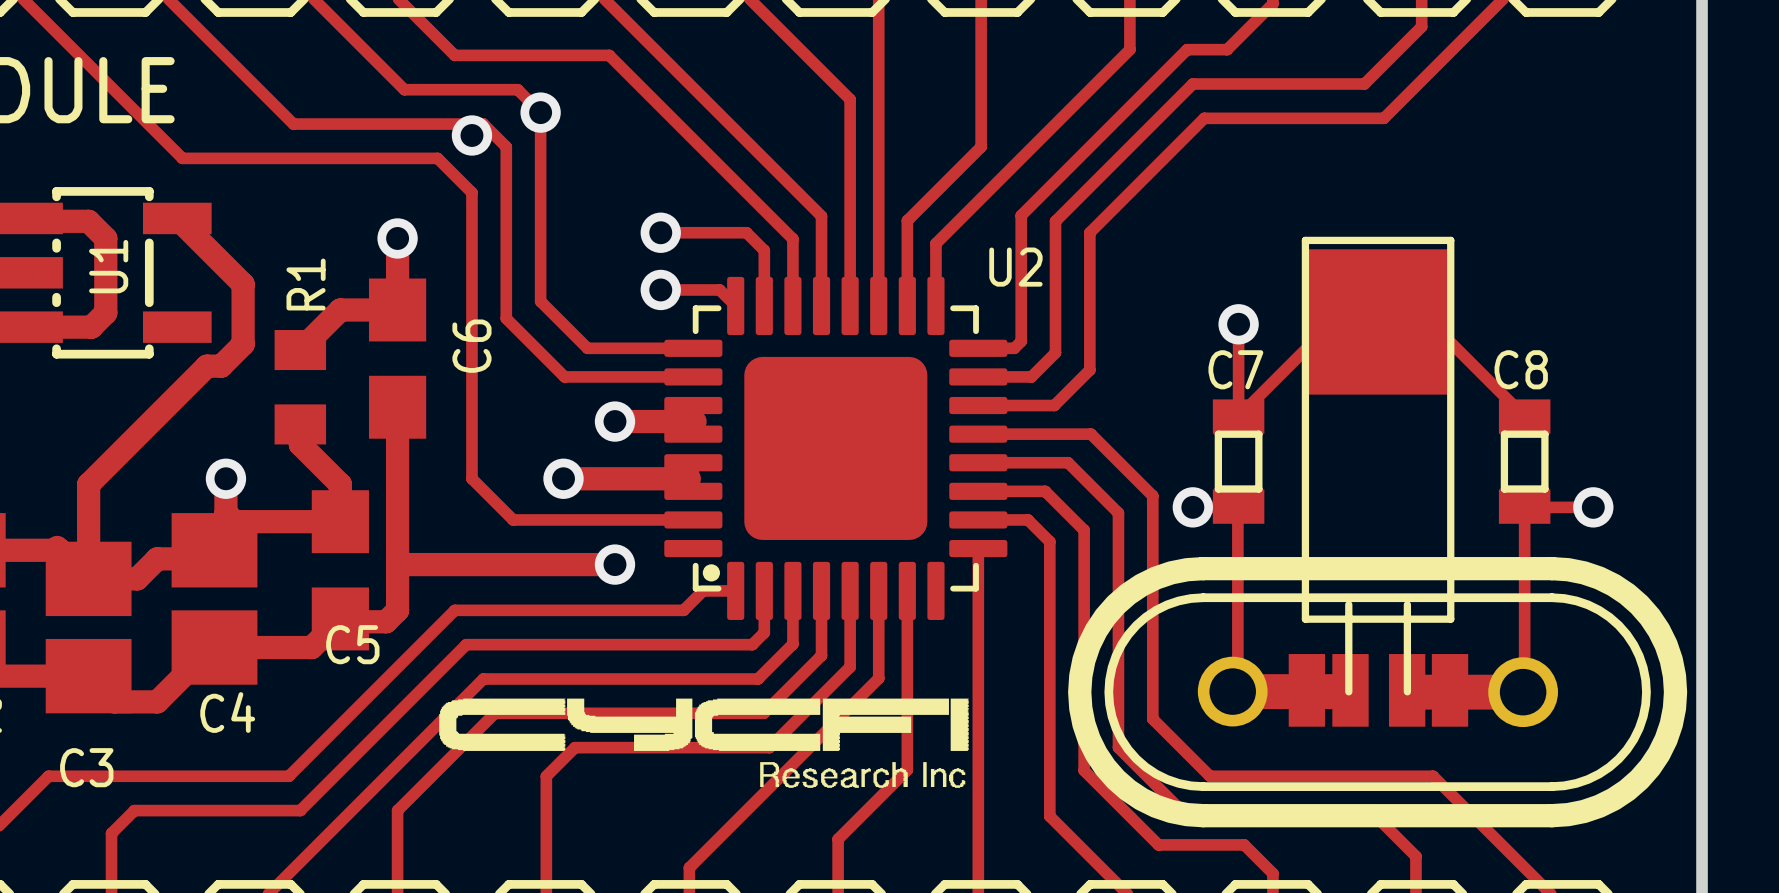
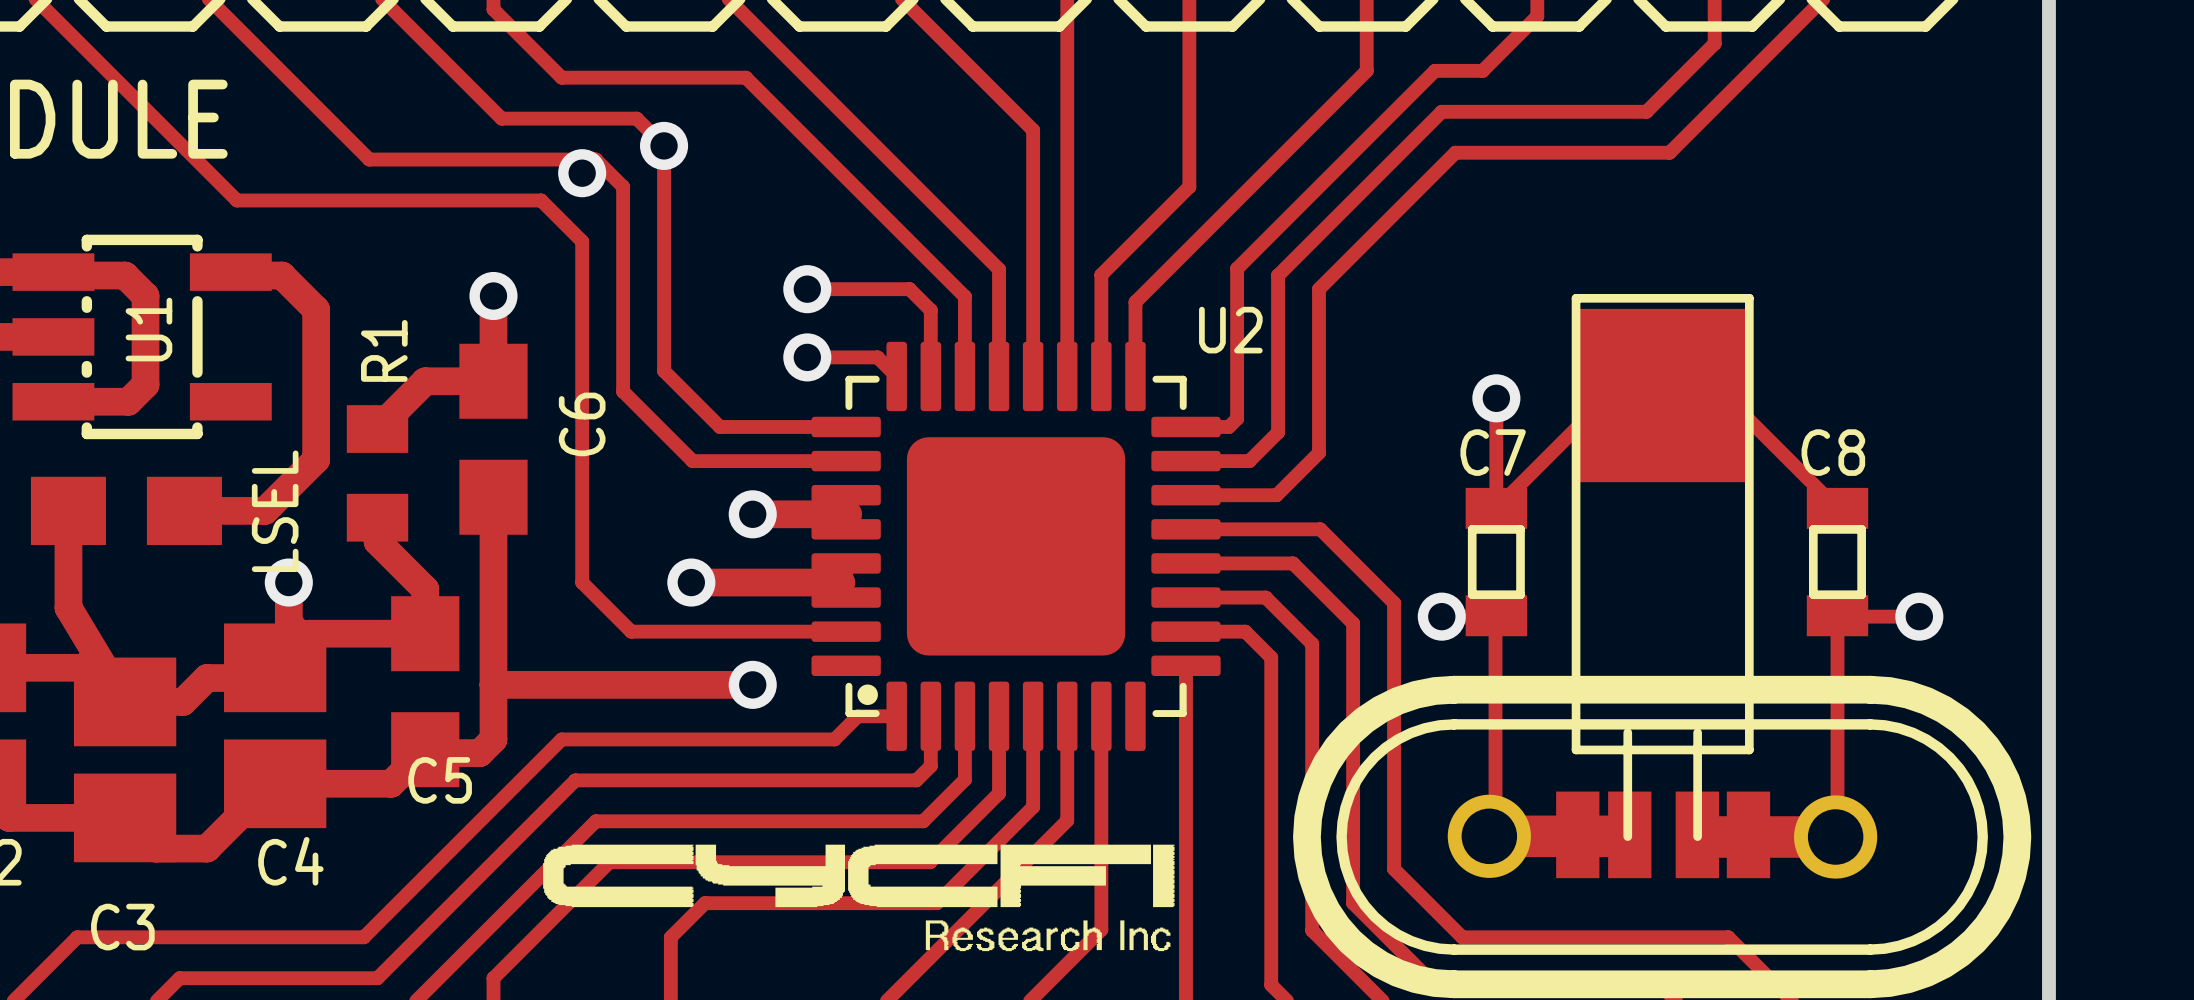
track: (177, 218) (243, 284) (243, 344) (221, 366) (206, 366) (88, 484) (88, 578) -> (230, 272) (251, 275) (281, 275) (316, 309) (316, 459) (264, 510) (184, 510)
track: none -> (68, 510) (68, 607) (125, 701)
LSEL: none -> (126, 510)

